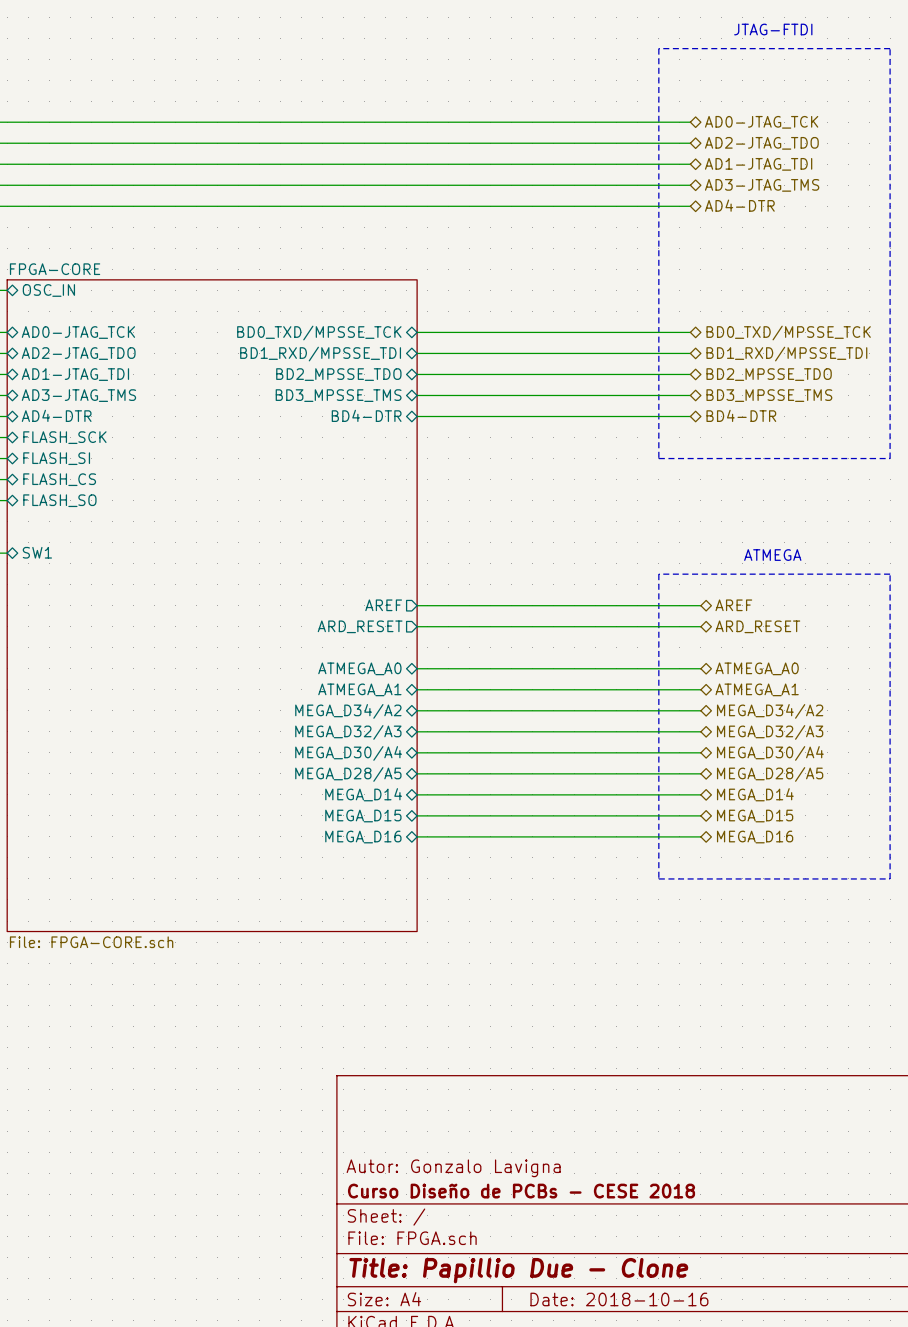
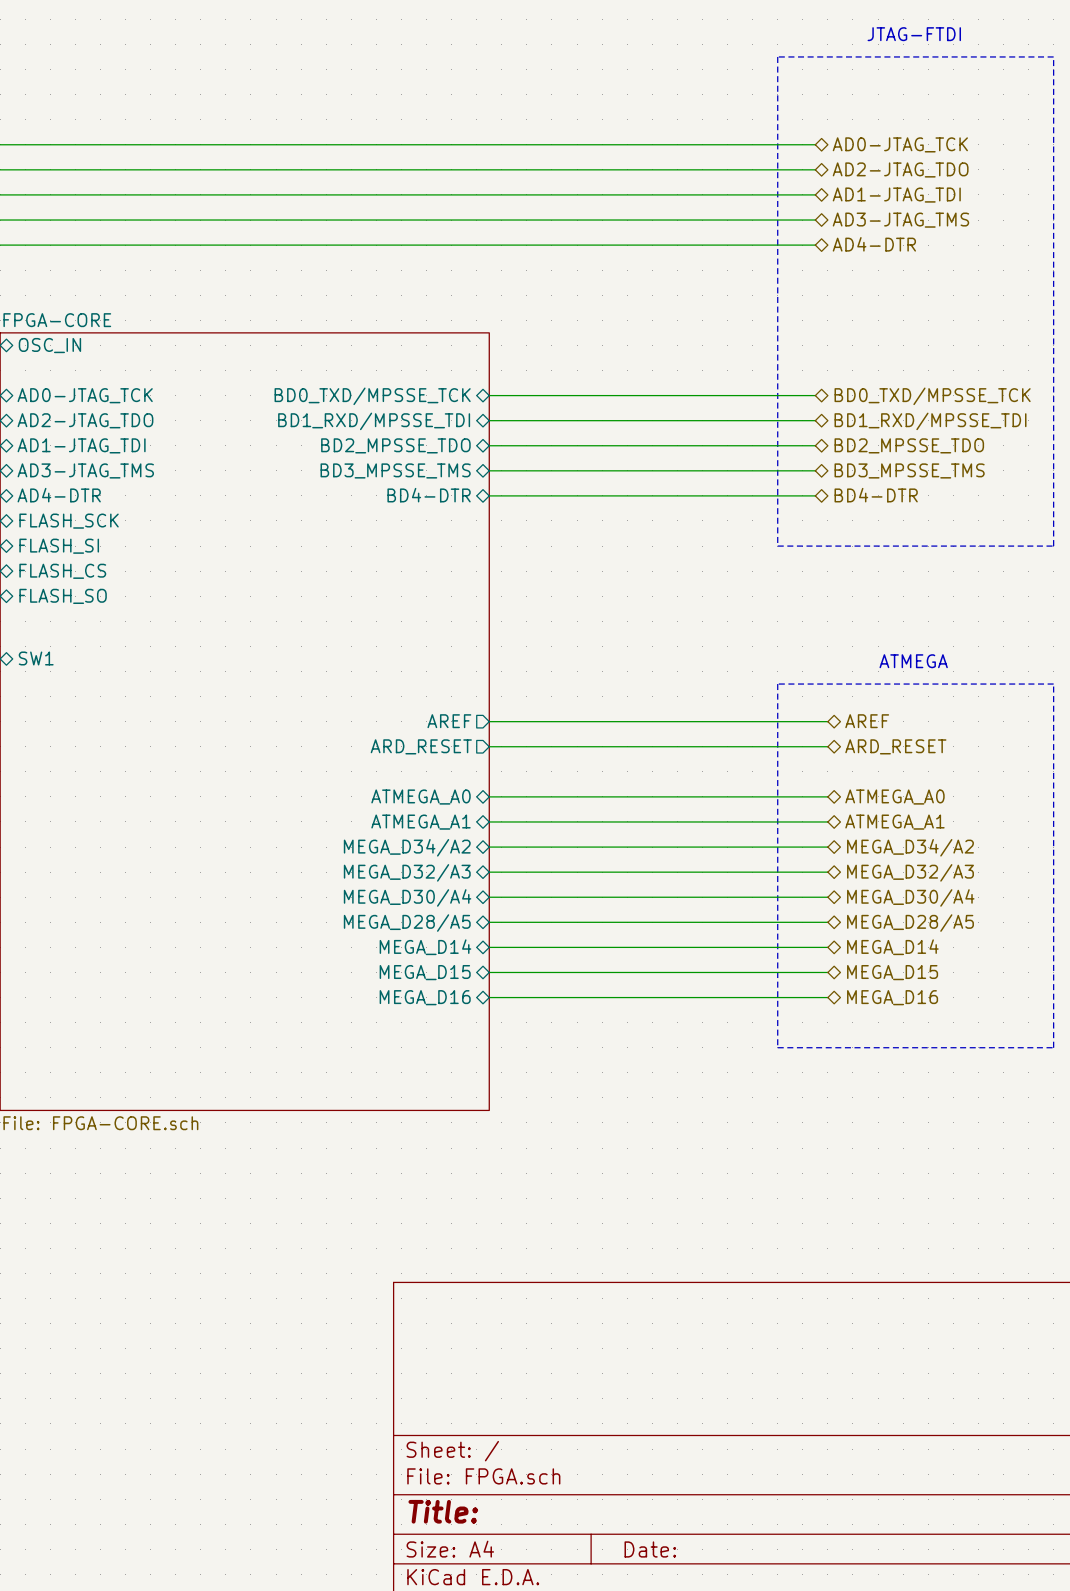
title block: Autor: Gonzalo Lavigna (453, 1168) -> none
title block: Curso Diseño de PCBs - CESE 2018 (521, 1191) -> none
title block: Title: Papillio Due - Clone (518, 1270) -> Title: (443, 1511)
title block: Date: 2018-10-16 (619, 1299) -> Date: (650, 1549)

